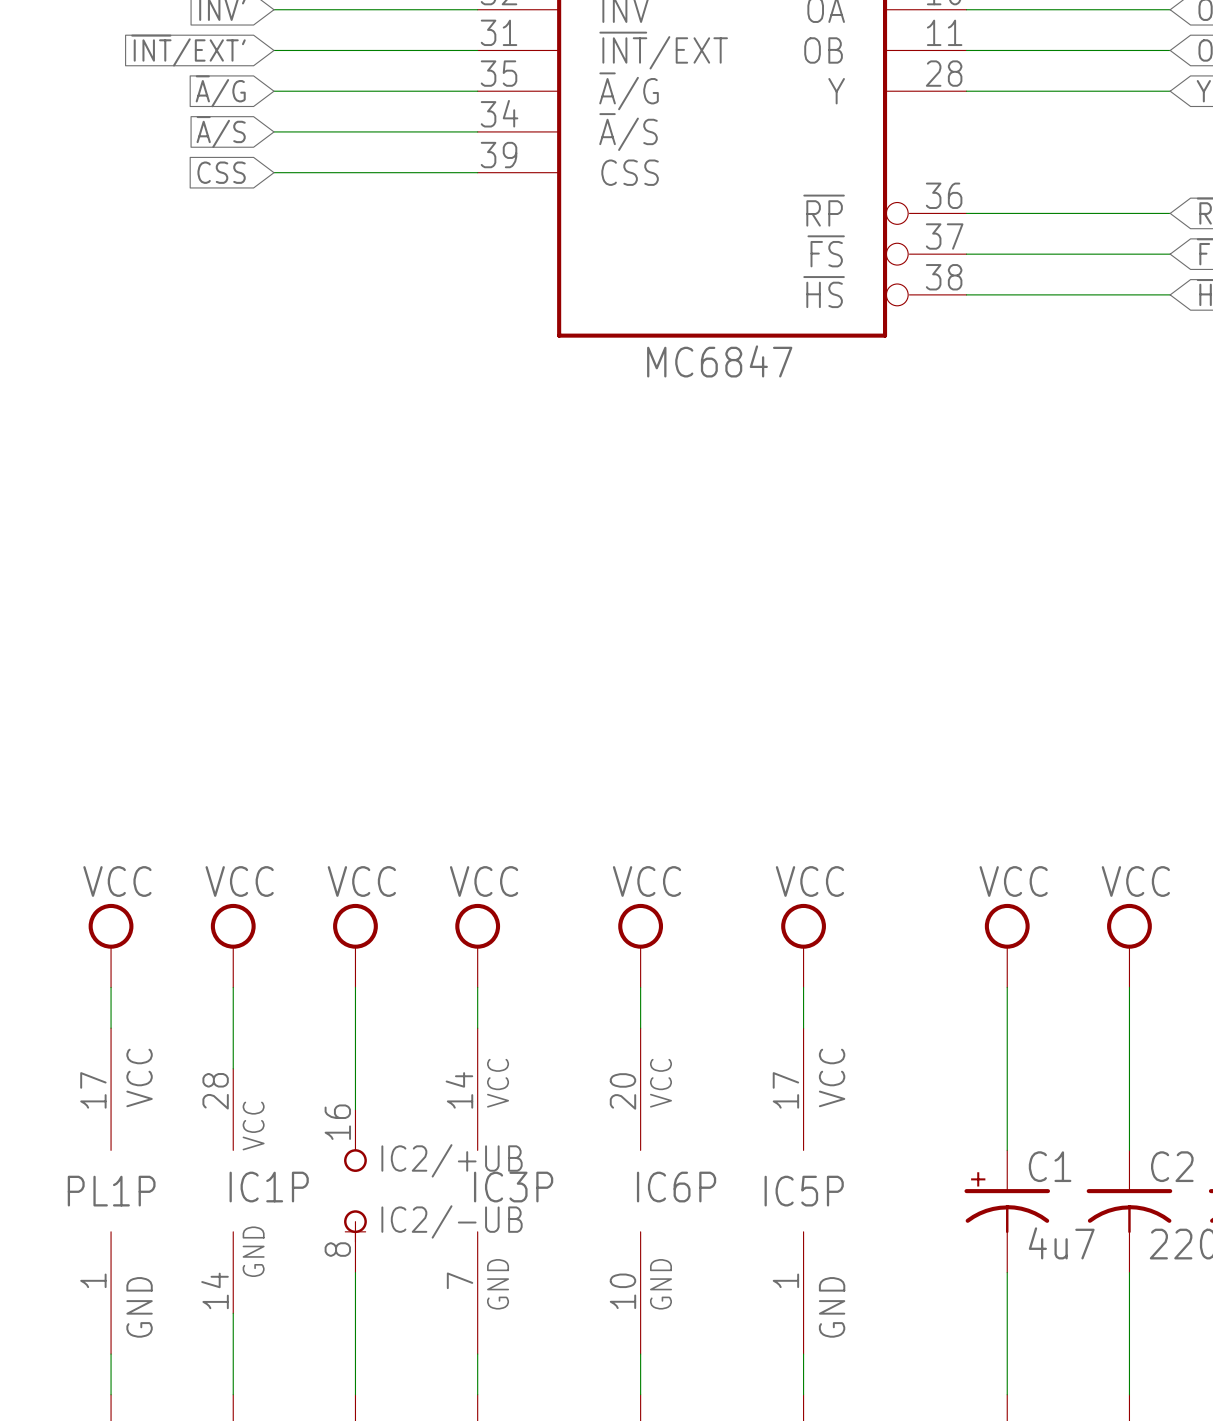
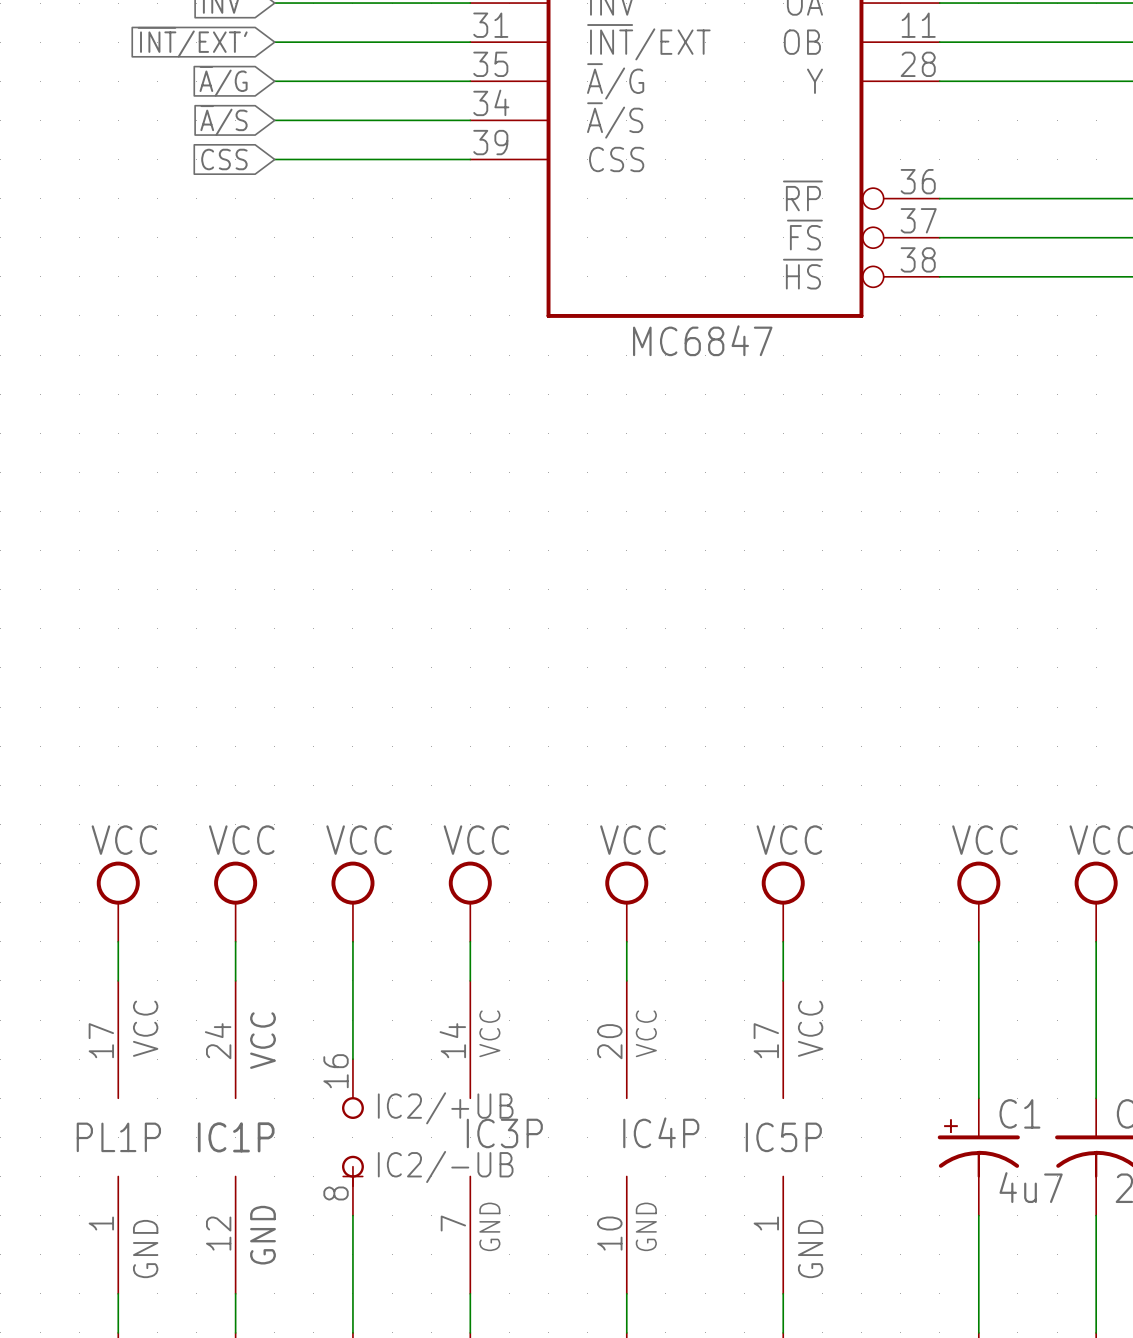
IC1P symbol: [233, 1068, 234, 1314] -> [235, 980, 236, 1294]
IC1P name position: IC1P (269, 1187) -> IC1P (236, 1137)
IC6P name: IC6P (676, 1187) -> IC4P (661, 1132)

